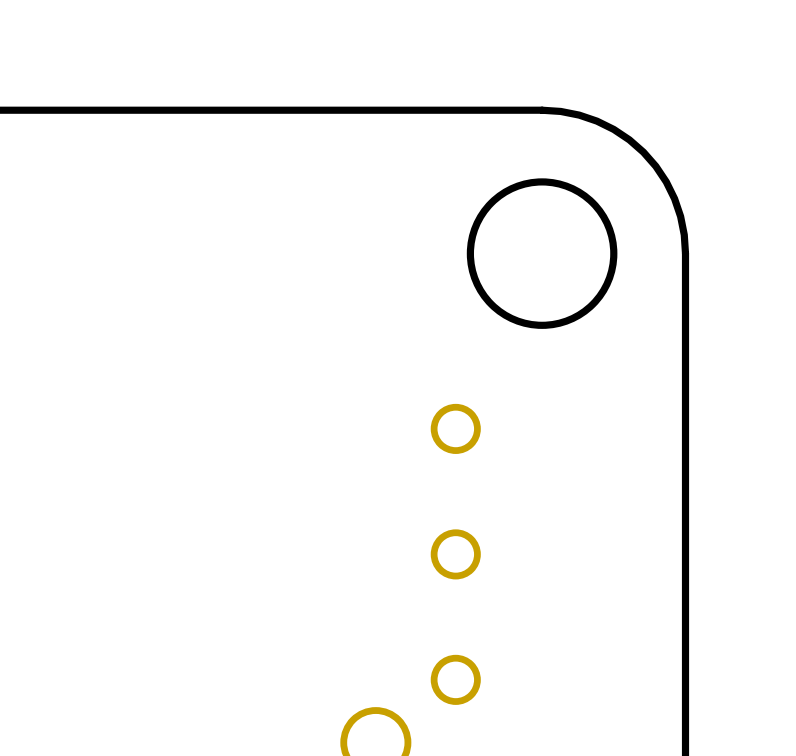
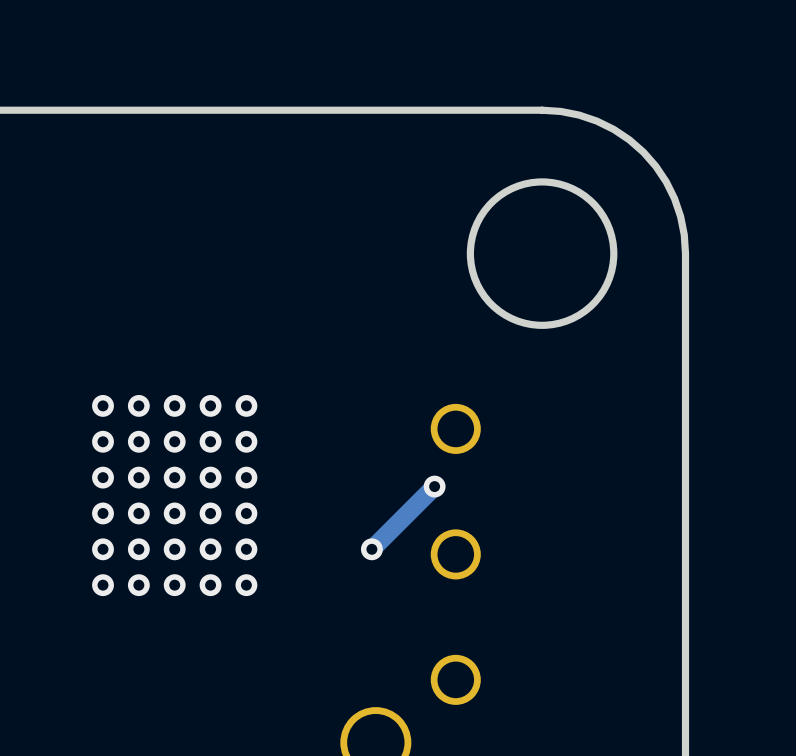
via: none -> (103, 405)
via: none -> (138, 405)
via: none -> (174, 405)
via: none -> (210, 405)
via: none -> (246, 405)
via: none -> (103, 441)
via: none -> (138, 441)
via: none -> (174, 441)
via: none -> (210, 441)
via: none -> (246, 441)
via: none -> (103, 477)
via: none -> (138, 477)
via: none -> (174, 477)
via: none -> (210, 477)
via: none -> (246, 477)
track: none -> (434, 486) (371, 549)
via: none -> (434, 486)
via: none -> (103, 513)
via: none -> (138, 513)
via: none -> (174, 513)
via: none -> (210, 513)
via: none -> (246, 513)
via: none -> (103, 549)
via: none -> (138, 549)
via: none -> (174, 549)
via: none -> (210, 549)
via: none -> (246, 549)
via: none -> (371, 549)
via: none -> (103, 585)
via: none -> (138, 585)
via: none -> (174, 585)
via: none -> (210, 585)
via: none -> (246, 585)

